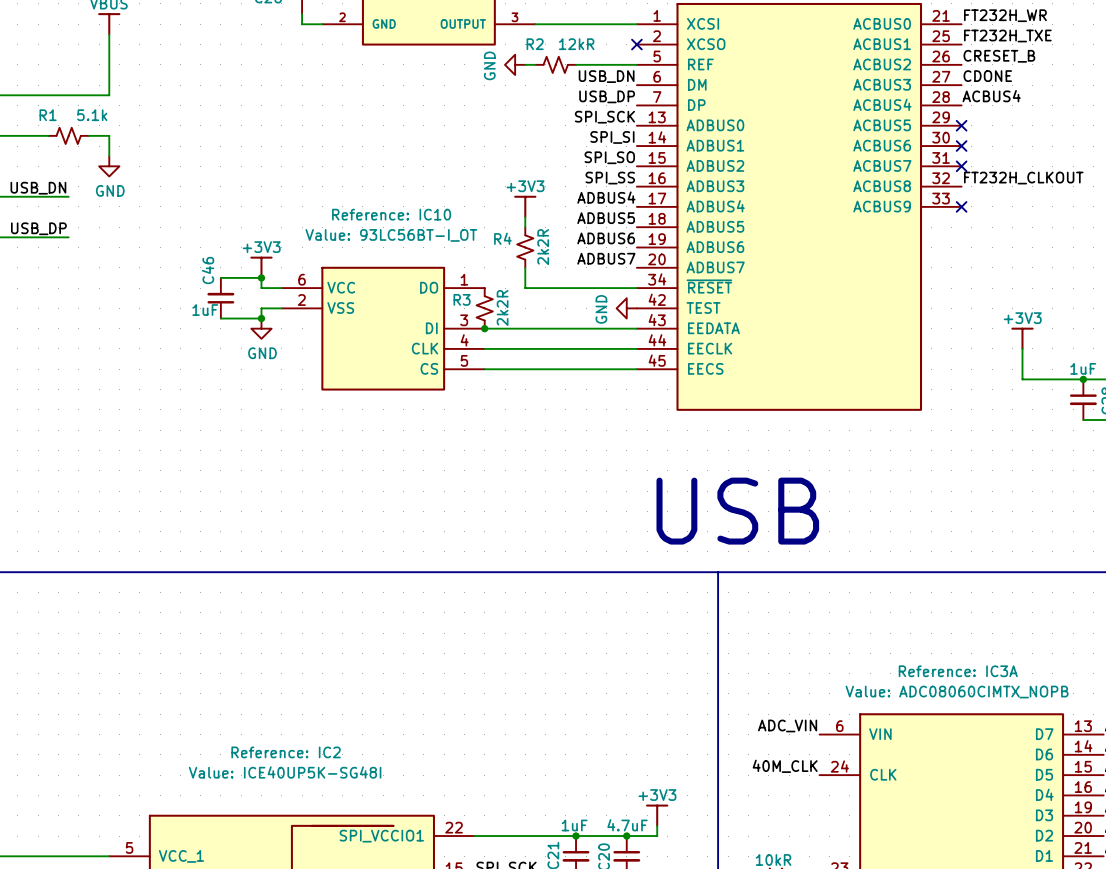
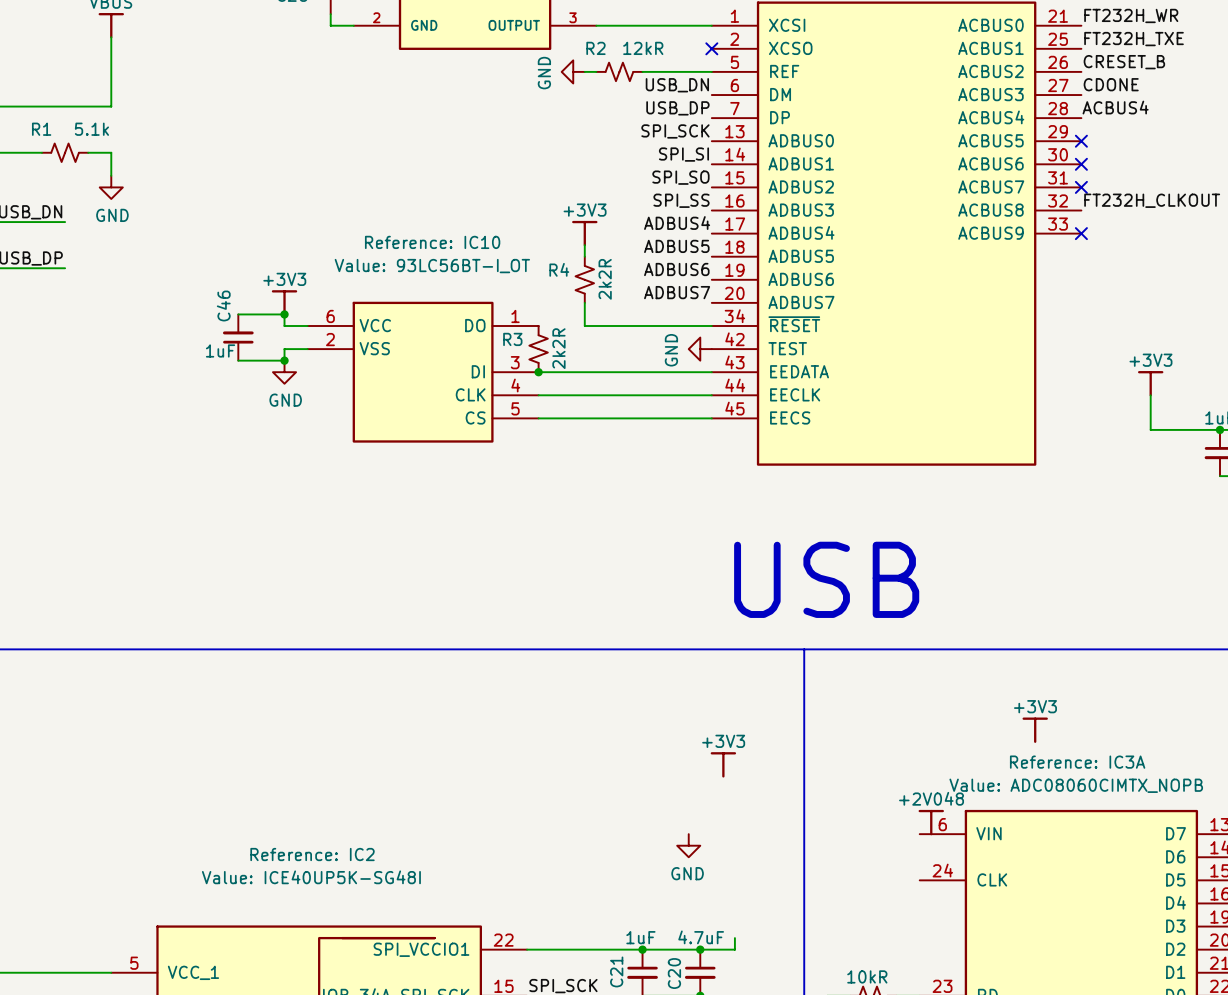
power symbol: none -> +3V3 (1035, 730)
power symbol: none -> +2V048 (931, 822)
label: ADC_VIN (787, 725) -> none
power symbol: none -> GND (688, 845)
label: 40M_CLK (785, 766) -> none
power symbol position: +3V3 (657, 815) -> +3V3 (723, 764)

